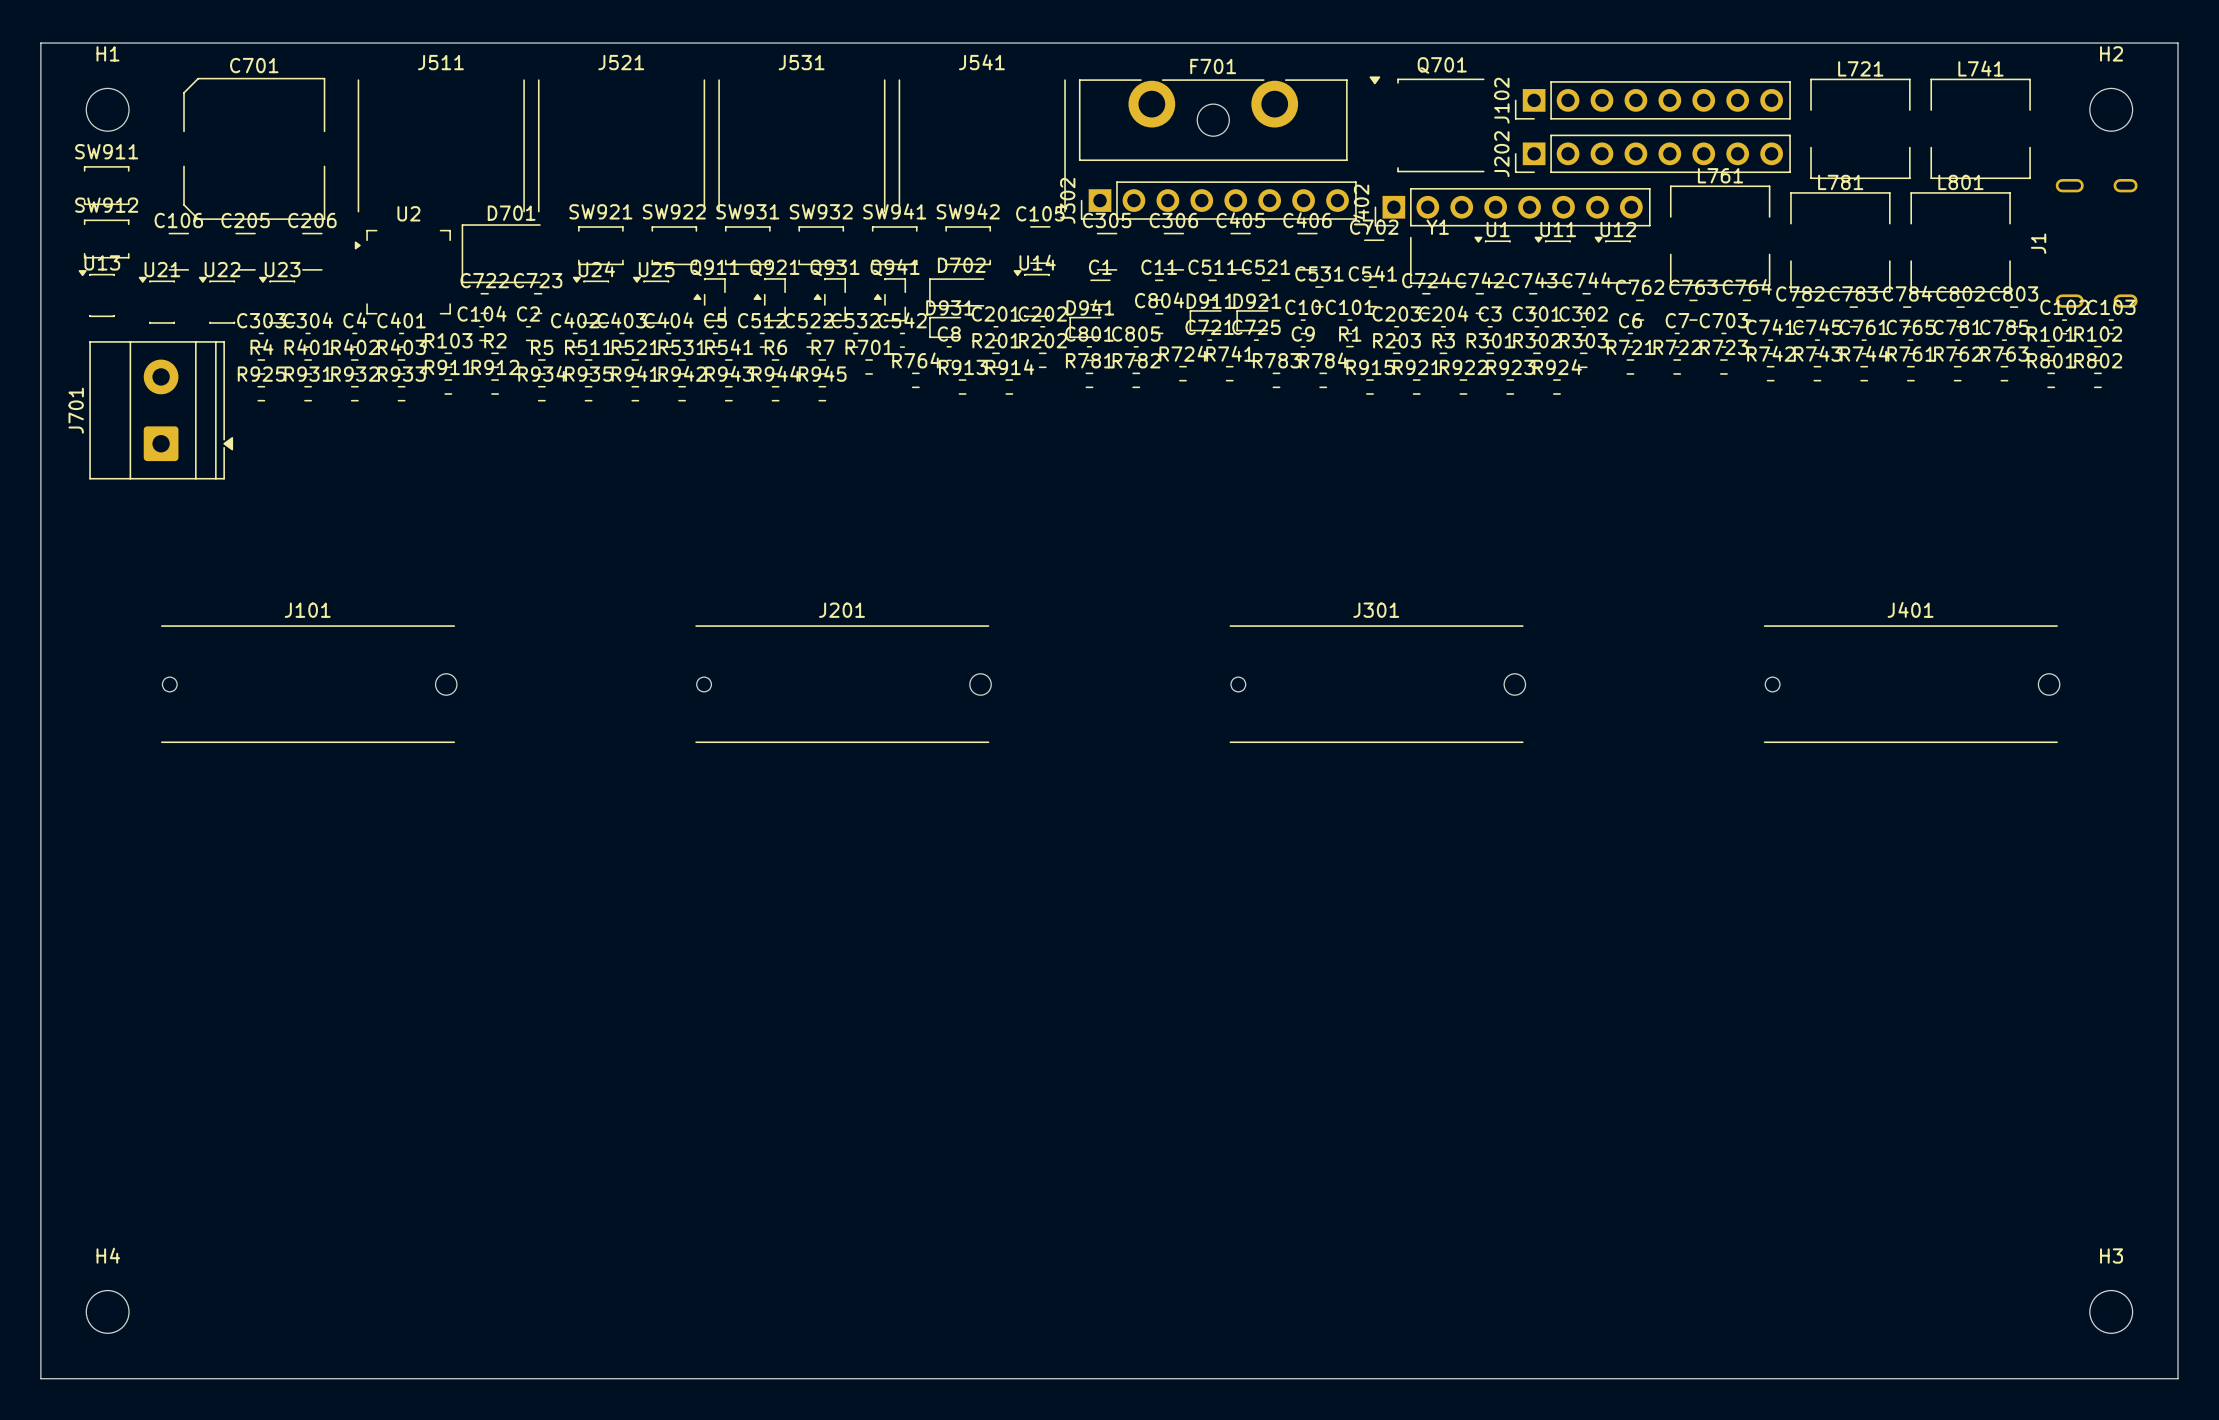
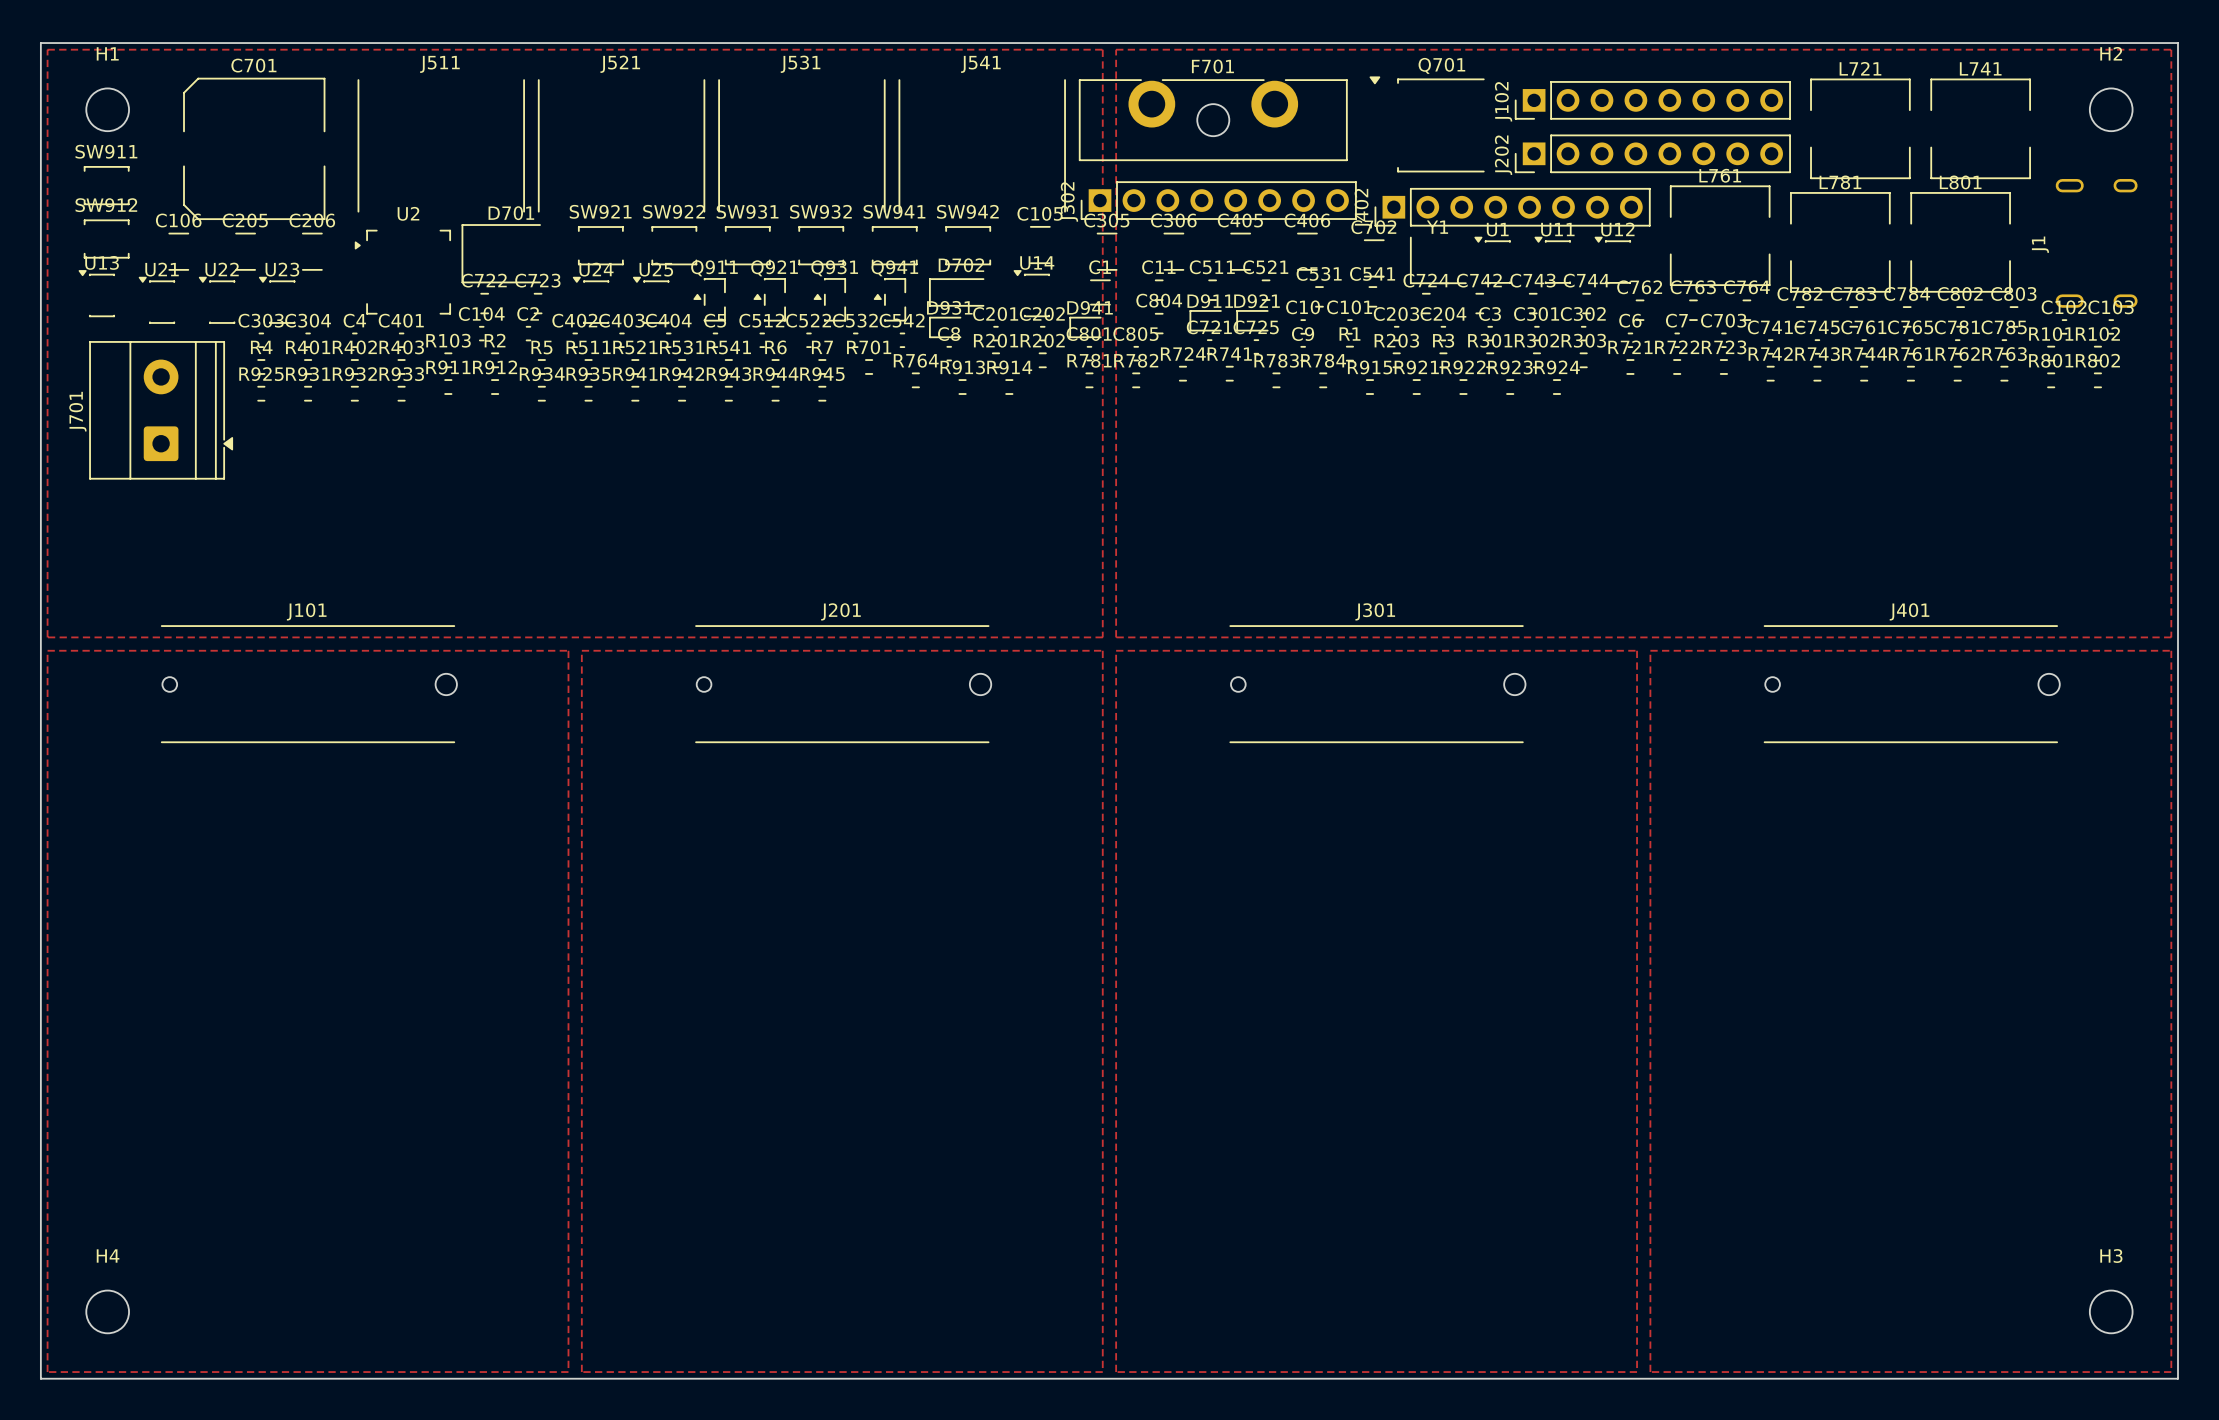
zone outline: none -> (47, 49) (47, 637) (1102, 637) (1102, 49) (47, 49)
zone outline: none -> (1116, 49) (2171, 49) (2171, 637) (1116, 637) (1116, 49)
zone outline: none -> (47, 650) (568, 650) (568, 1372) (47, 1372) (47, 650)
zone outline: none -> (581, 650) (1102, 650) (1102, 1372) (581, 1372) (581, 650)
zone outline: none -> (1116, 650) (1637, 650) (1637, 1372) (1116, 1372) (1116, 650)
zone outline: none -> (1650, 650) (2171, 650) (2171, 1372) (1650, 1372) (1650, 650)

